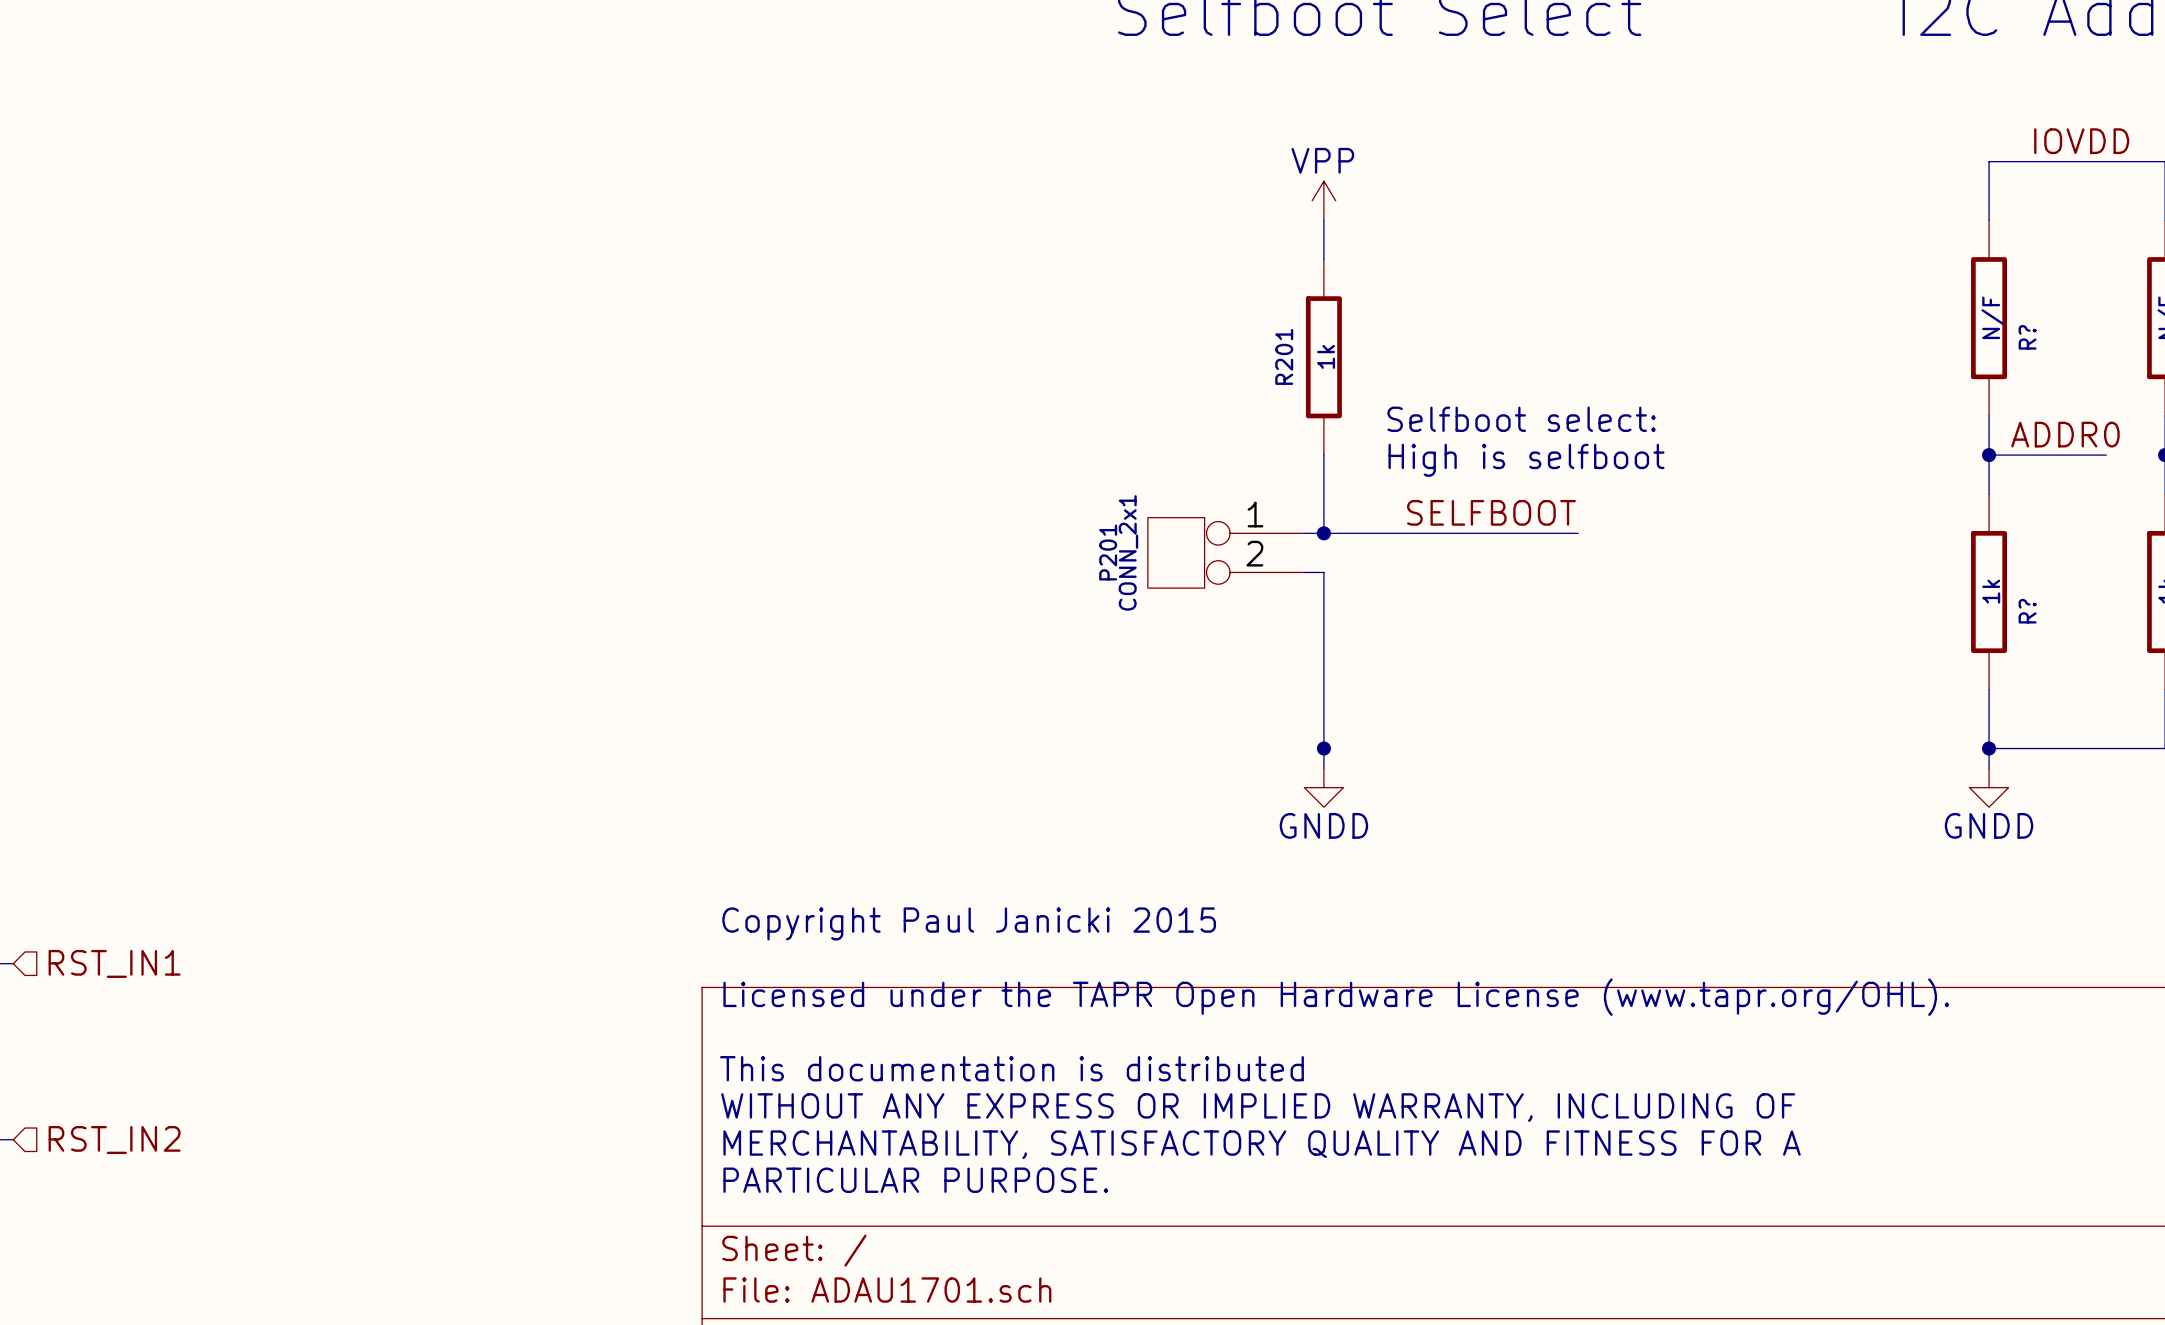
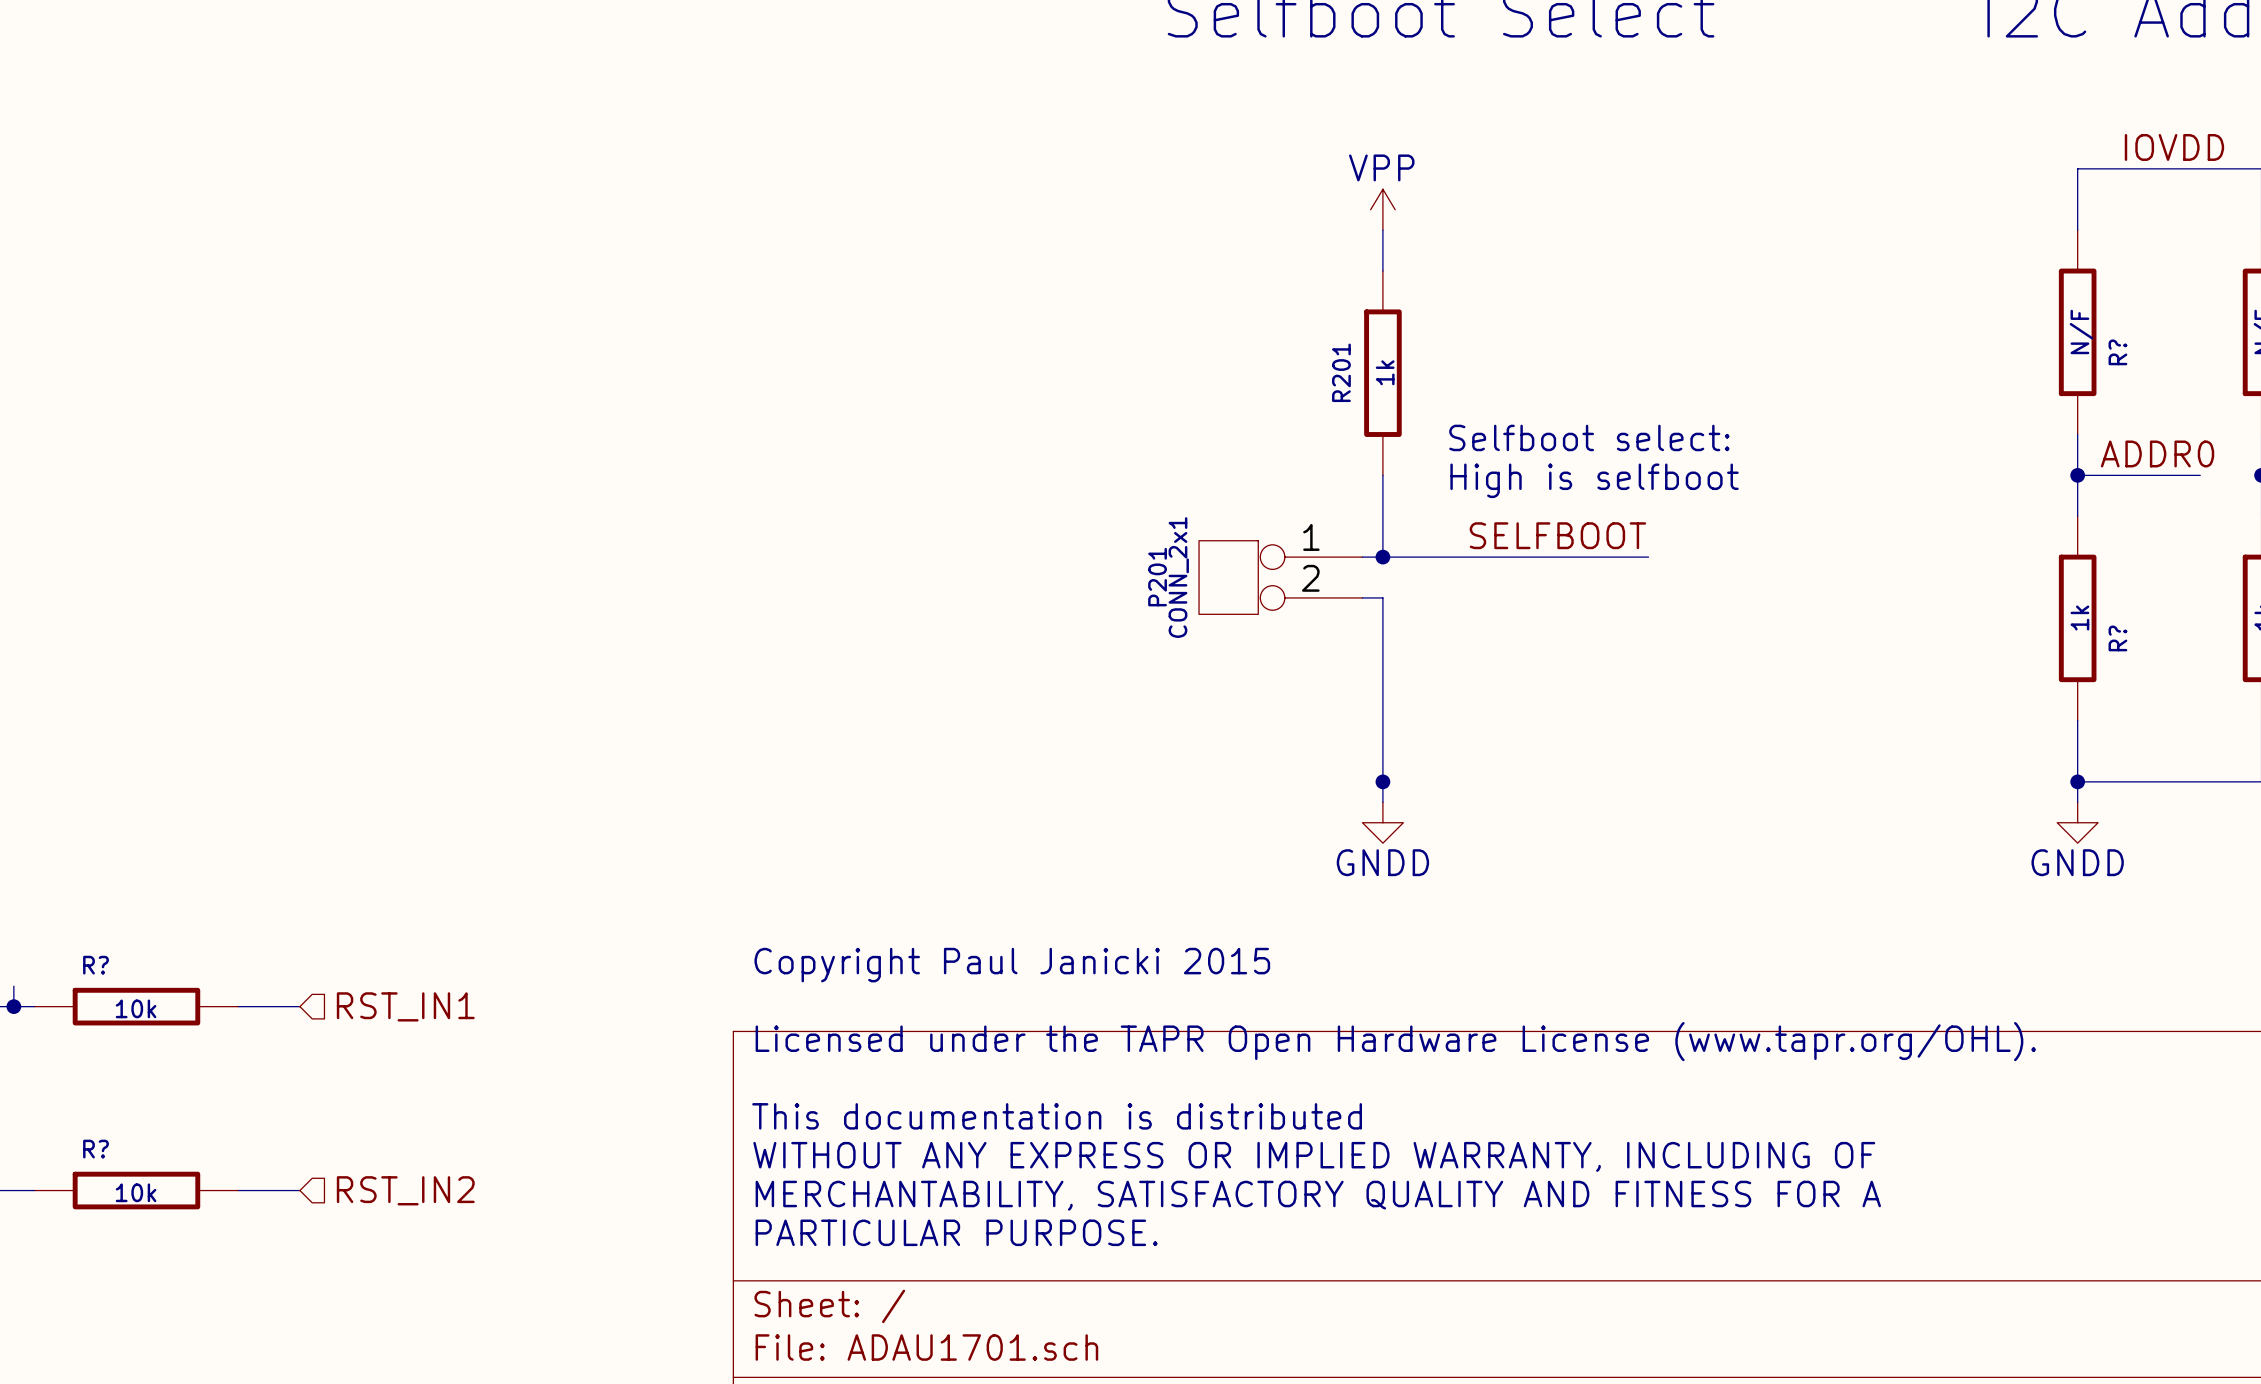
wire: none -> (13, 986) (13, 1006) (34, 1006)
junction: none -> (13, 1006)
hierarchical label position: RST_IN1 (114, 963) -> RST_IN1 (405, 1006)
R?: none -> 10k (136, 1006)
wire: none -> (238, 1006) (299, 1006)
wire: none -> (13, 1190) (34, 1190)
hierarchical label position: RST_IN2 (114, 1139) -> RST_IN2 (405, 1190)
R?: none -> 10k (136, 1190)
wire: none -> (238, 1190) (299, 1190)

